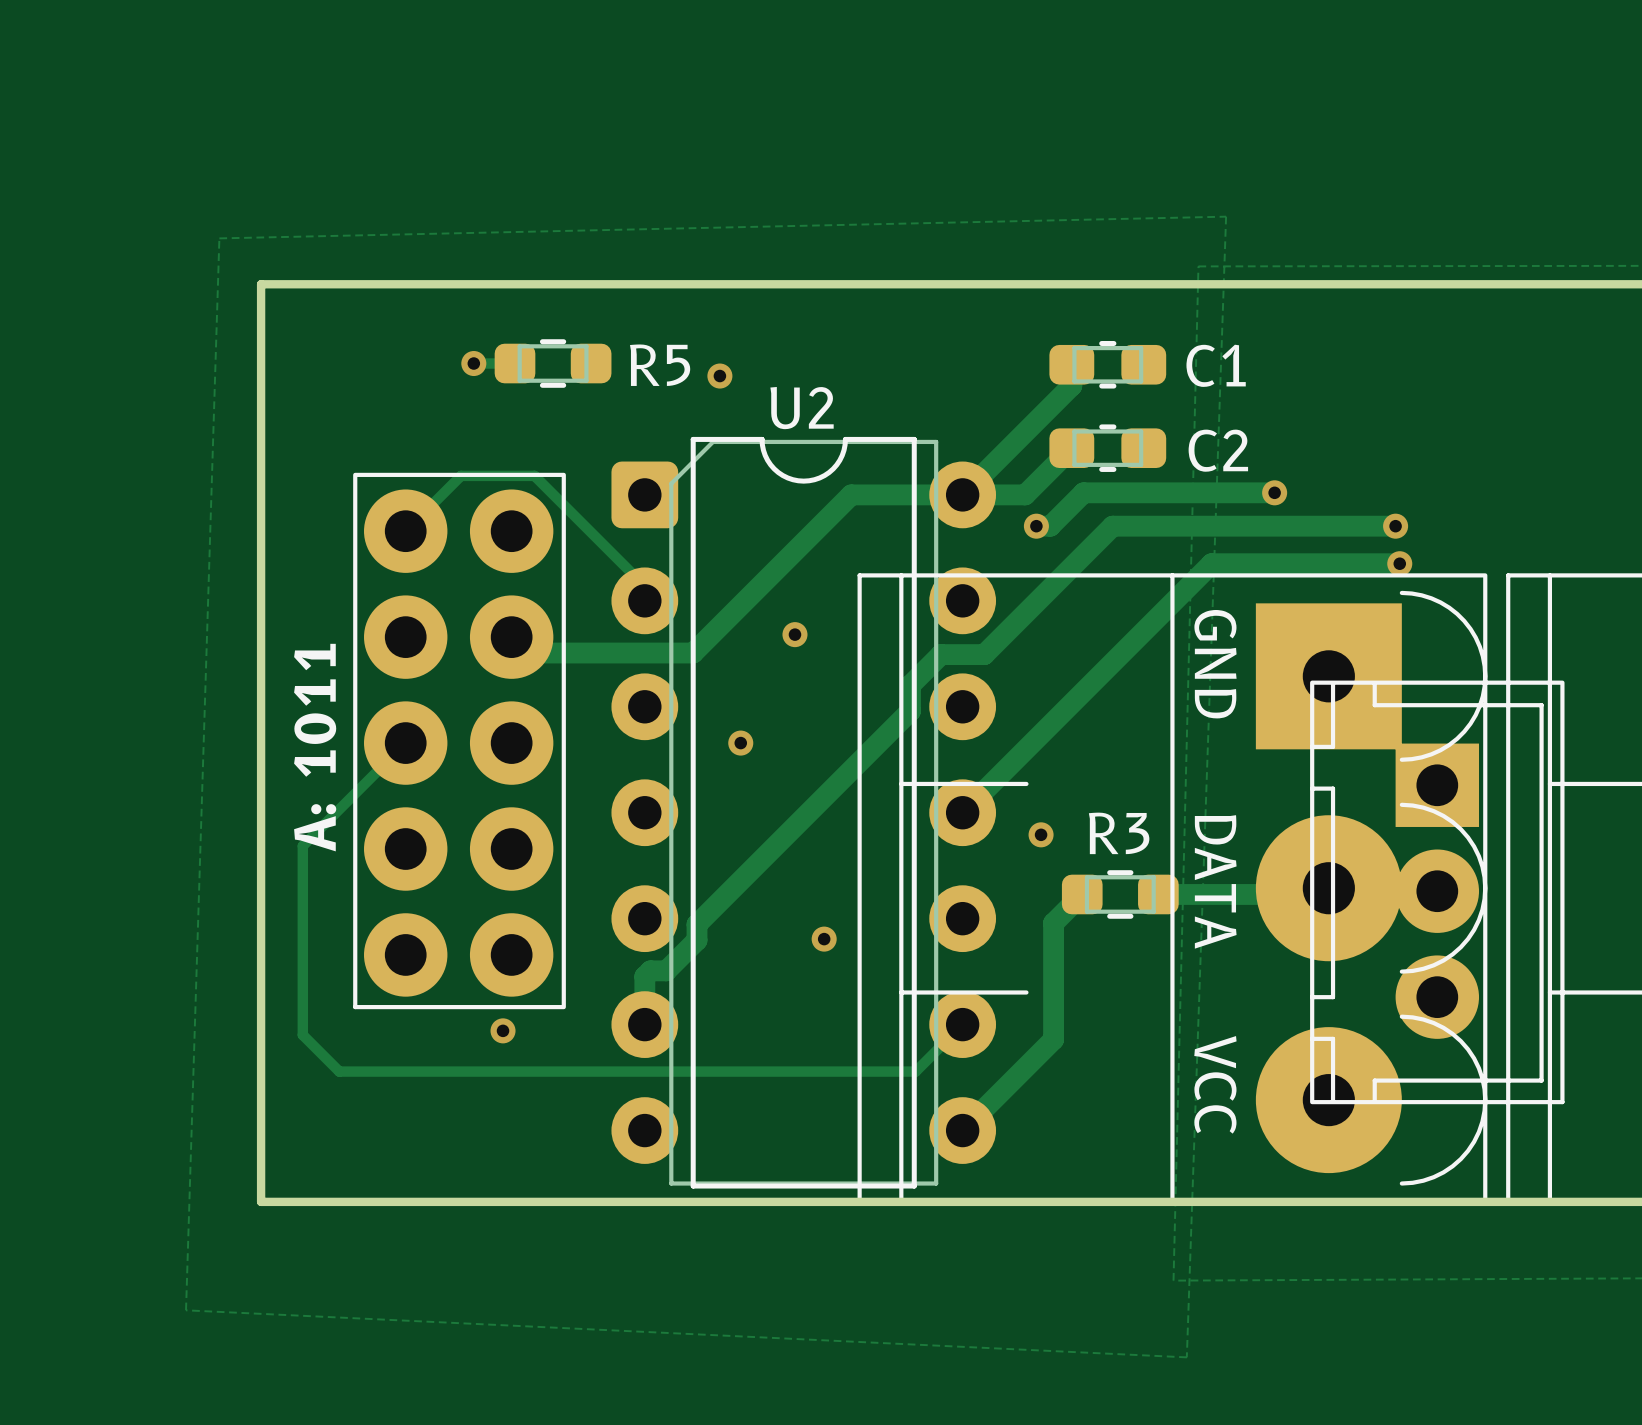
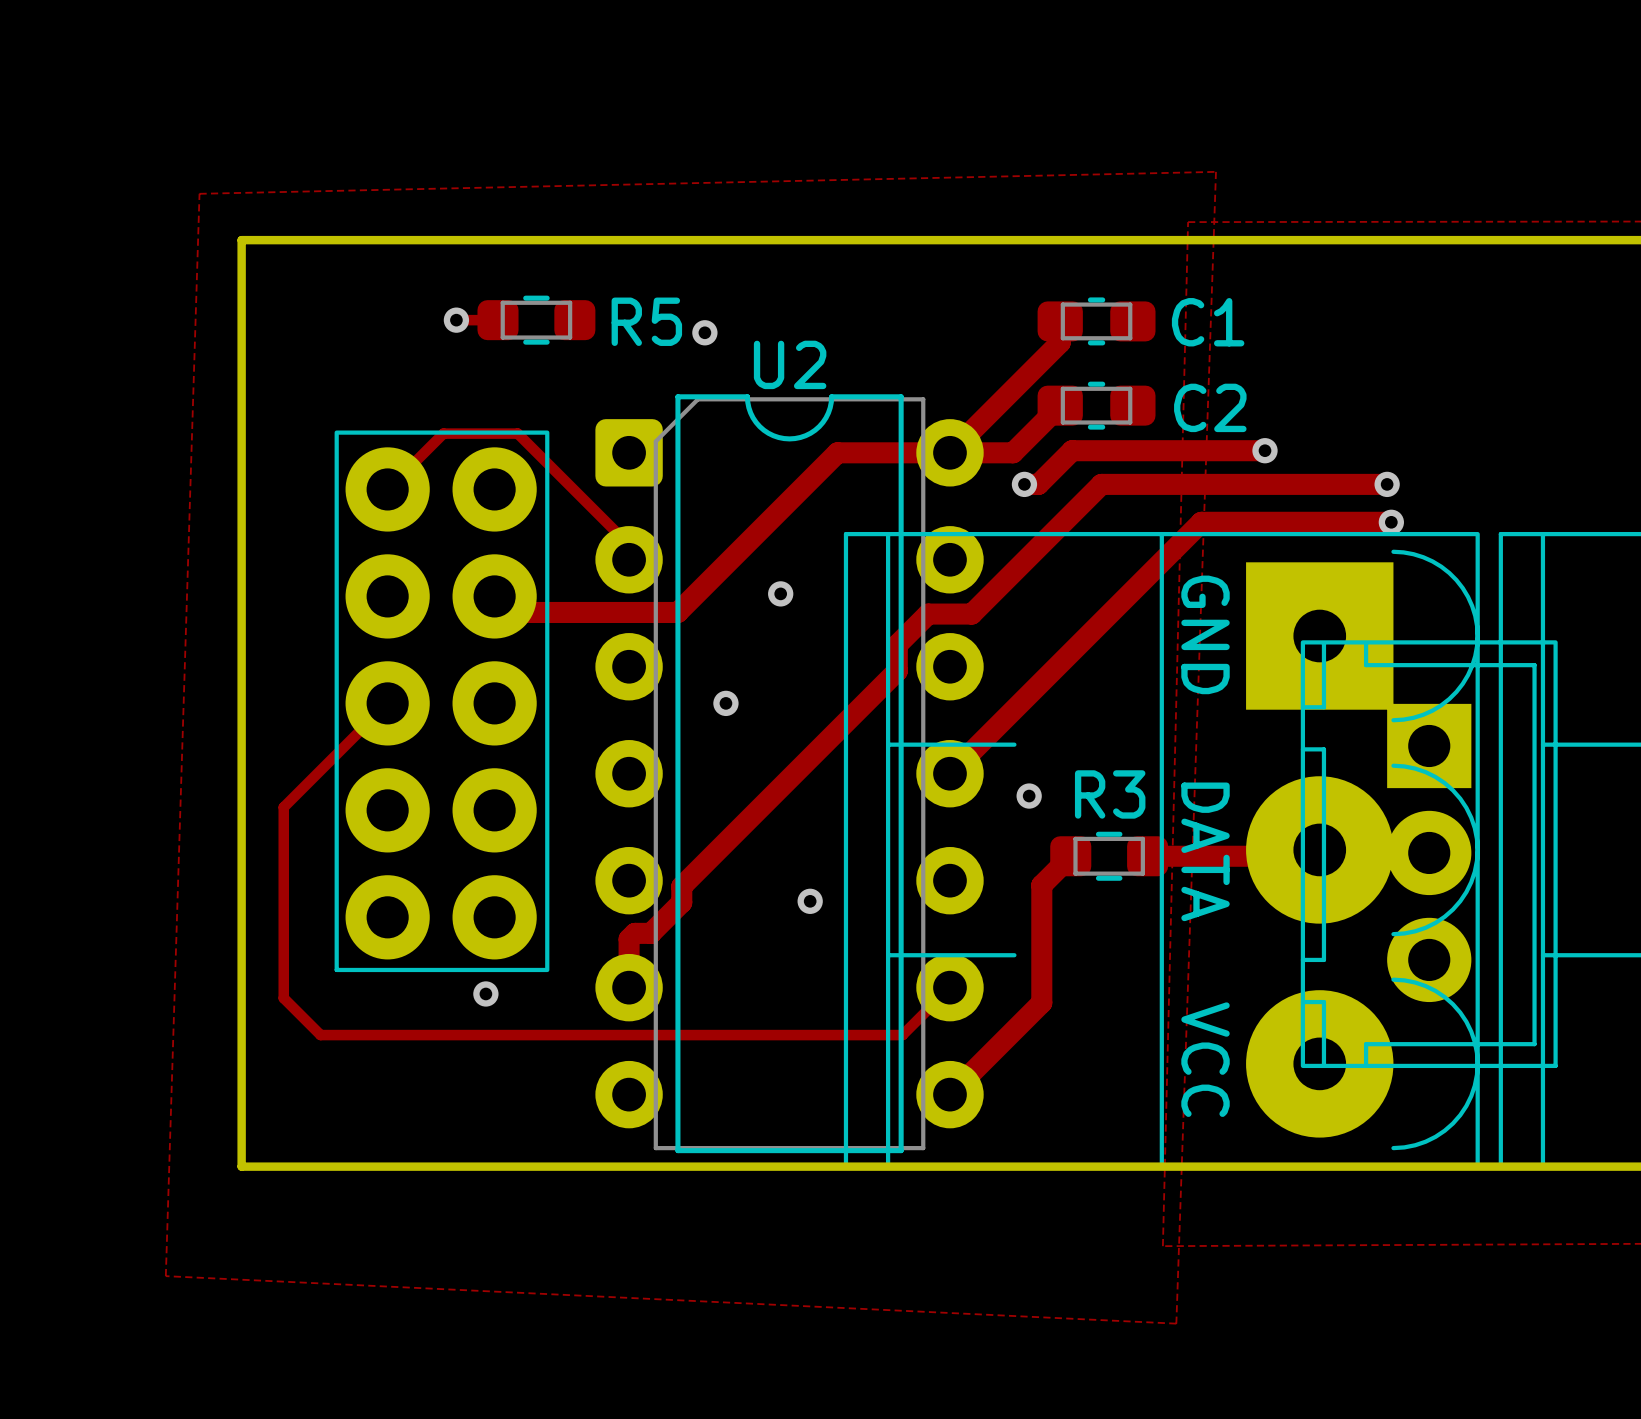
text: A: 1011 (315, 747) -> none

